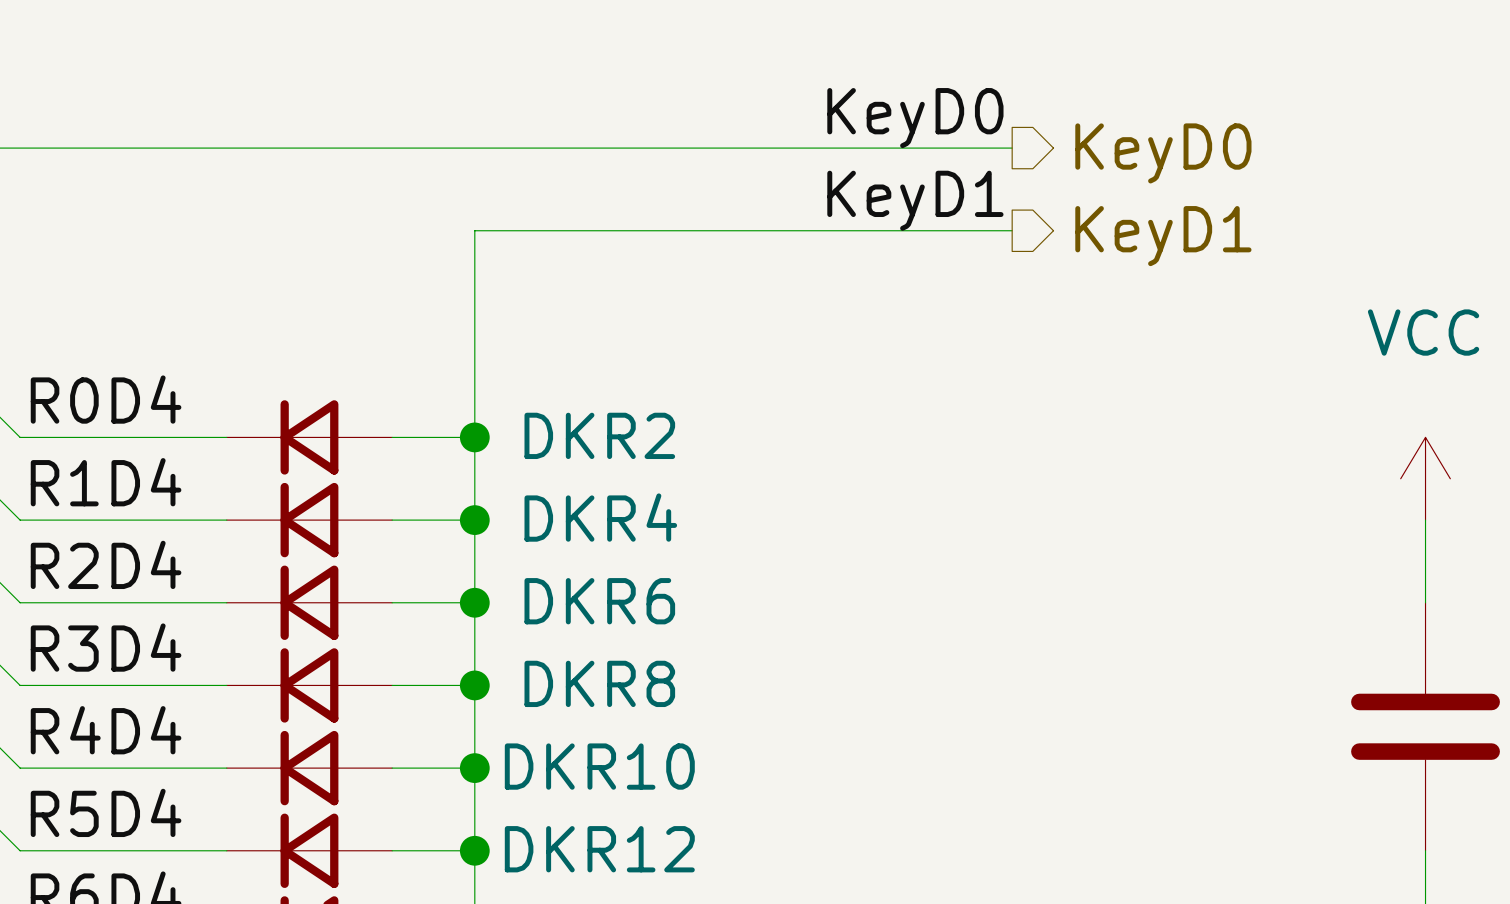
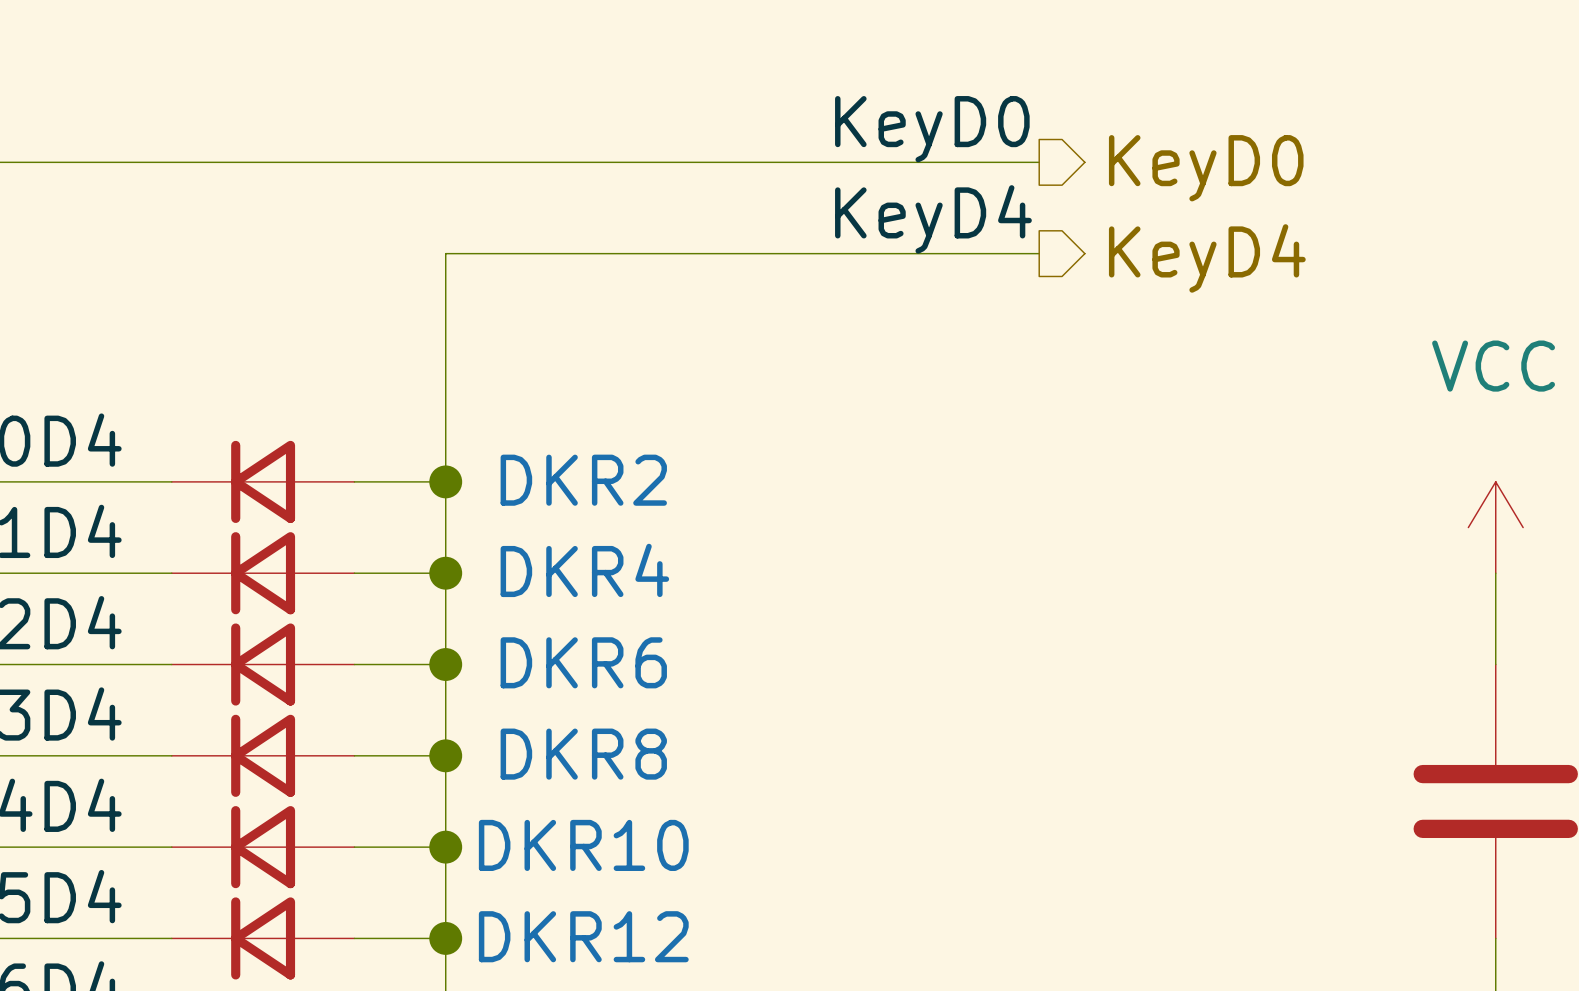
label: KeyD1 (915, 200) -> KeyD4 (933, 219)
hierarchical label: KeyD1 (1163, 236) -> KeyD4 (1207, 258)

